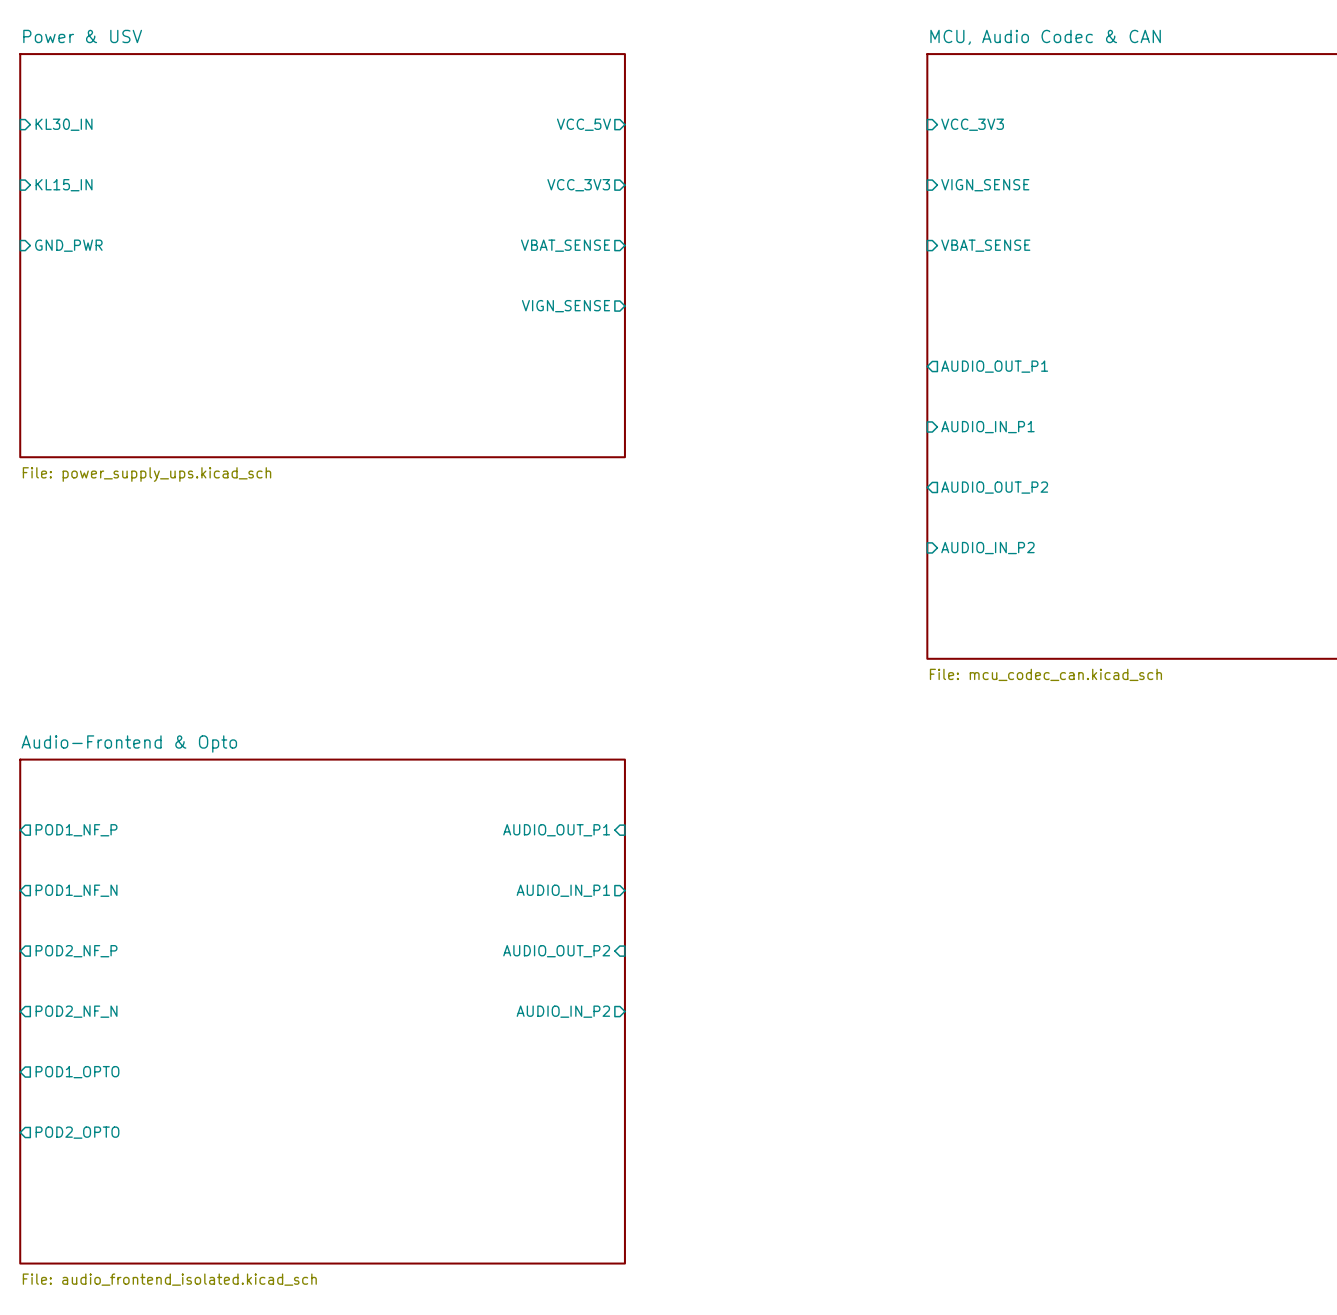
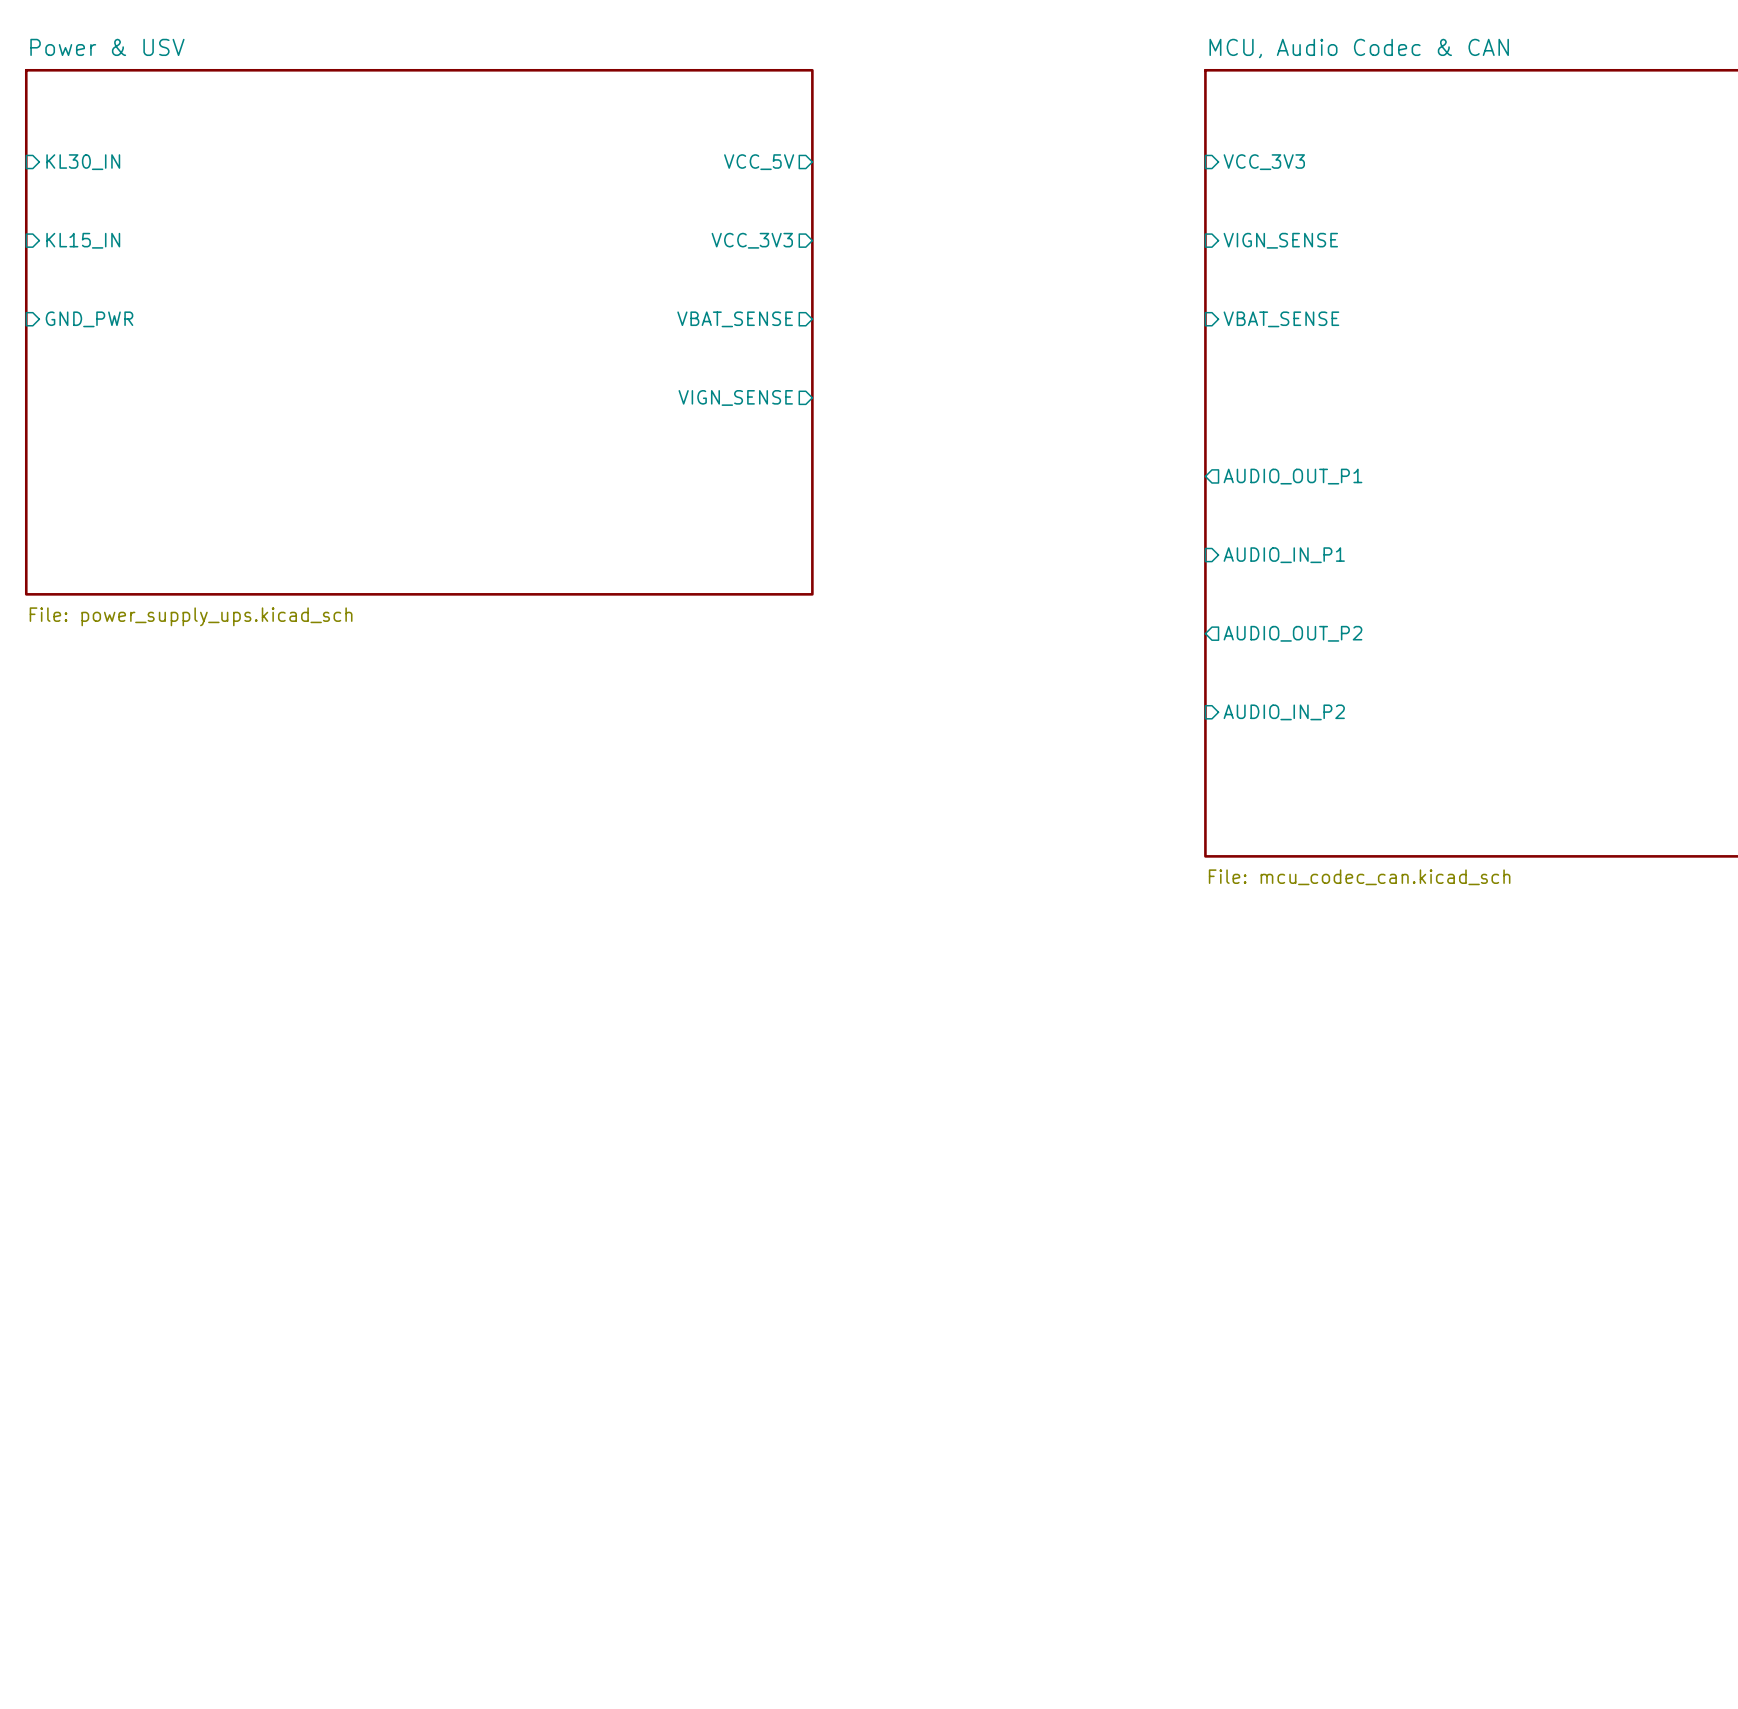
sheet pin: POD1_NF_P (76, 830) -> none
sheet pin: AUDIO_OUT_P1 (556, 830) -> none
sheet pin: POD1_NF_N (76, 890) -> none
sheet pin: AUDIO_IN_P1 (563, 890) -> none
sheet pin: POD2_NF_P (76, 951) -> none
sheet pin: AUDIO_OUT_P2 (556, 951) -> none
sheet pin: POD2_NF_N (76, 1011) -> none
sheet Audio-Frontend & Opto: File: audio_frontend_isolated.kicad_sch (322, 1011) -> none
sheet pin: AUDIO_IN_P2 (563, 1011) -> none
sheet pin: POD1_OPTO (77, 1072) -> none
sheet pin: POD2_OPTO (77, 1132) -> none

